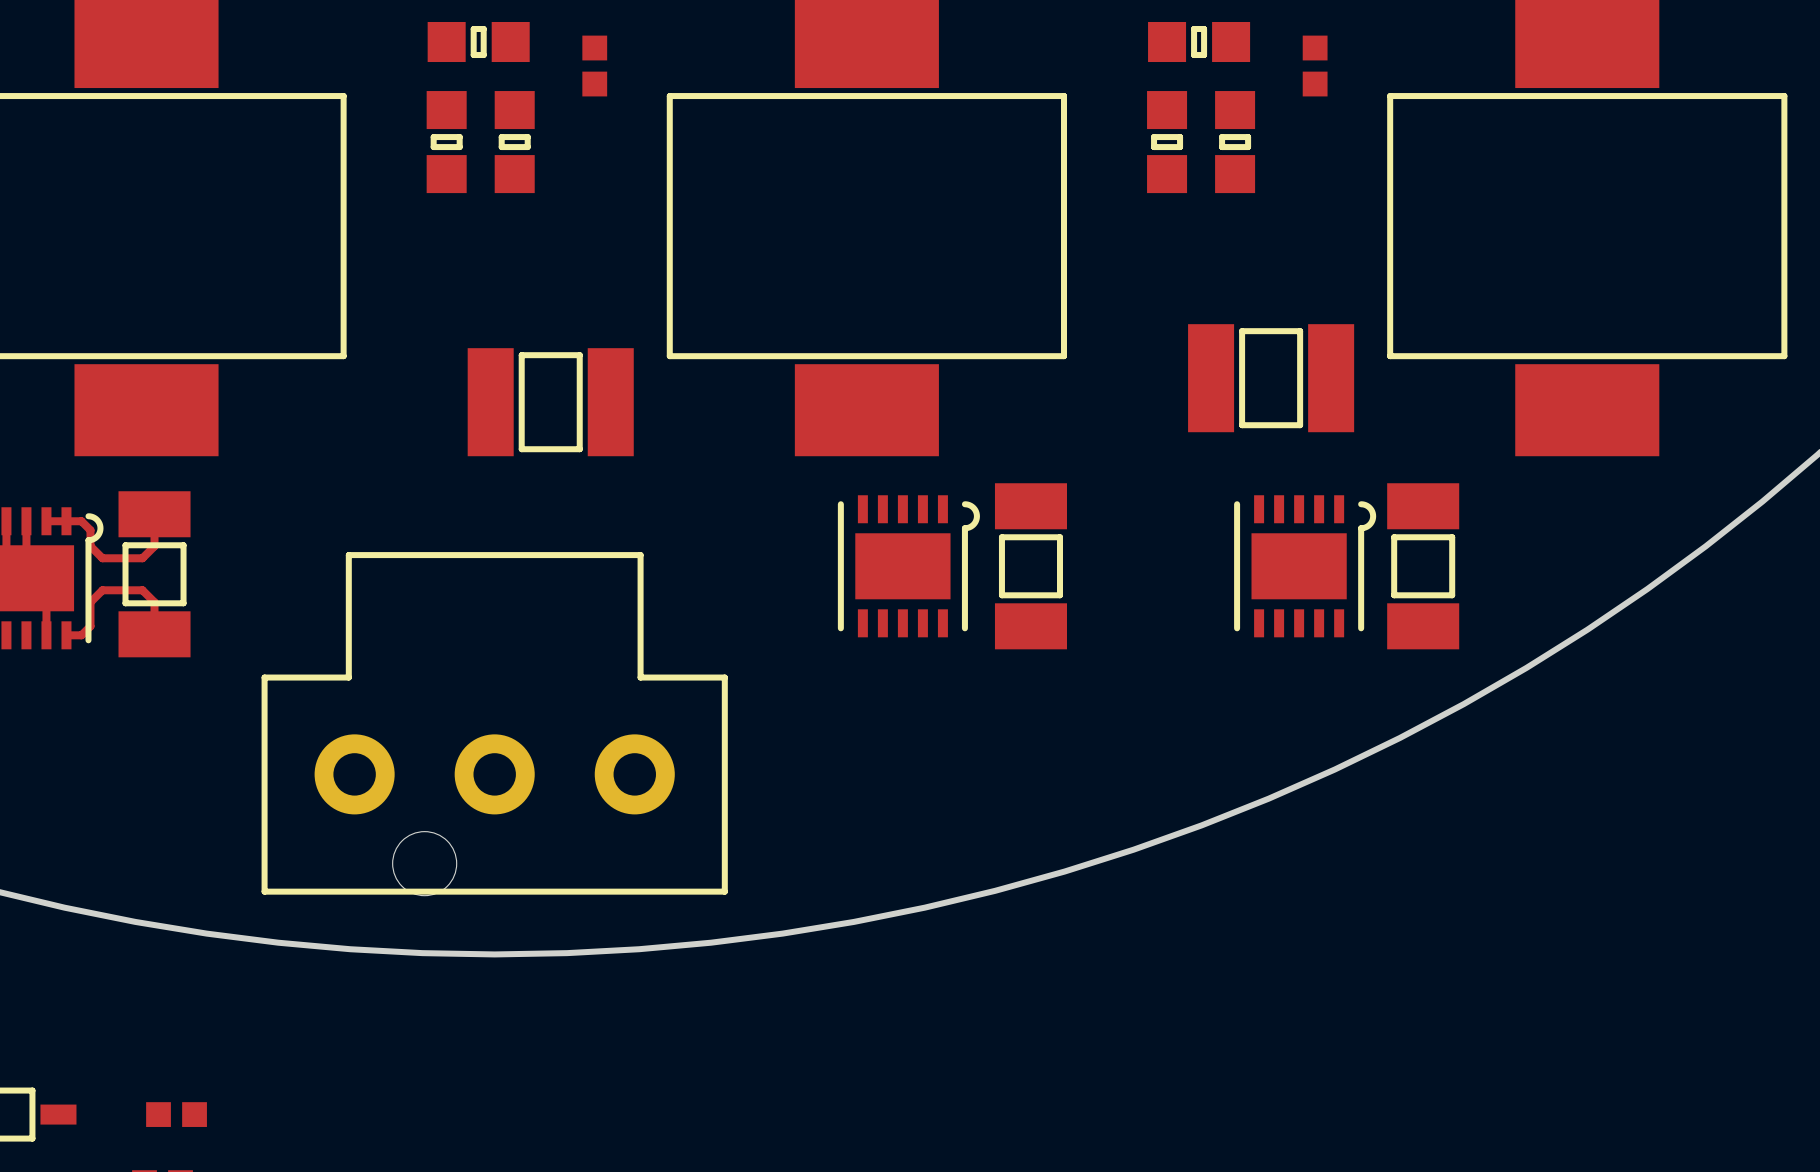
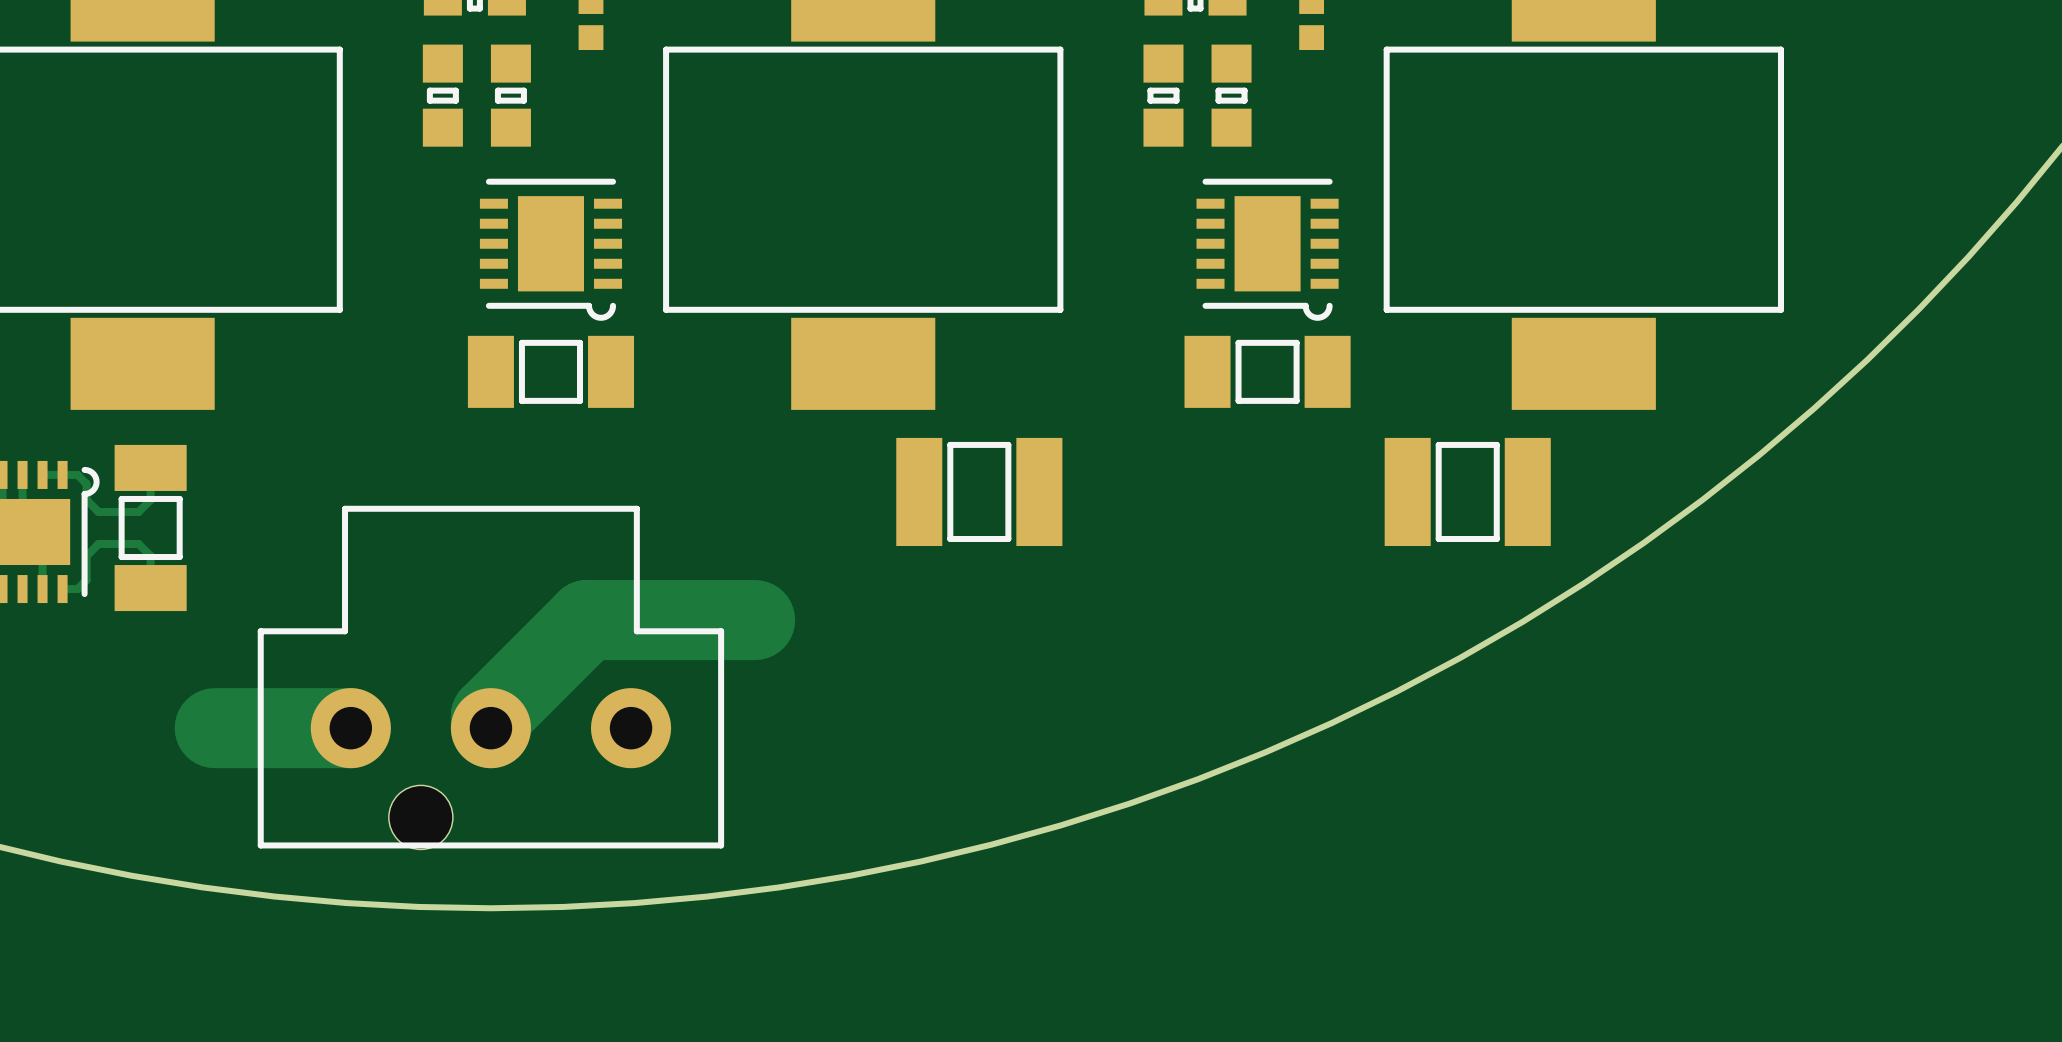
part: none -> (550, 249)
part: none -> (1267, 249)
part footprint: [1188, 324, 1355, 433] -> [1184, 335, 1351, 408]
part footprint: [467, 348, 634, 457] -> [467, 335, 635, 408]
part: none -> (979, 491)
part: none -> (1467, 491)
part: (908, 566) -> none
part: (1030, 566) -> none
part: (1305, 566) -> none
part: (1423, 566) -> none
track: none -> (755, 620) (587, 620) (490, 716) (490, 728)
track: none -> (214, 728) (350, 728)

